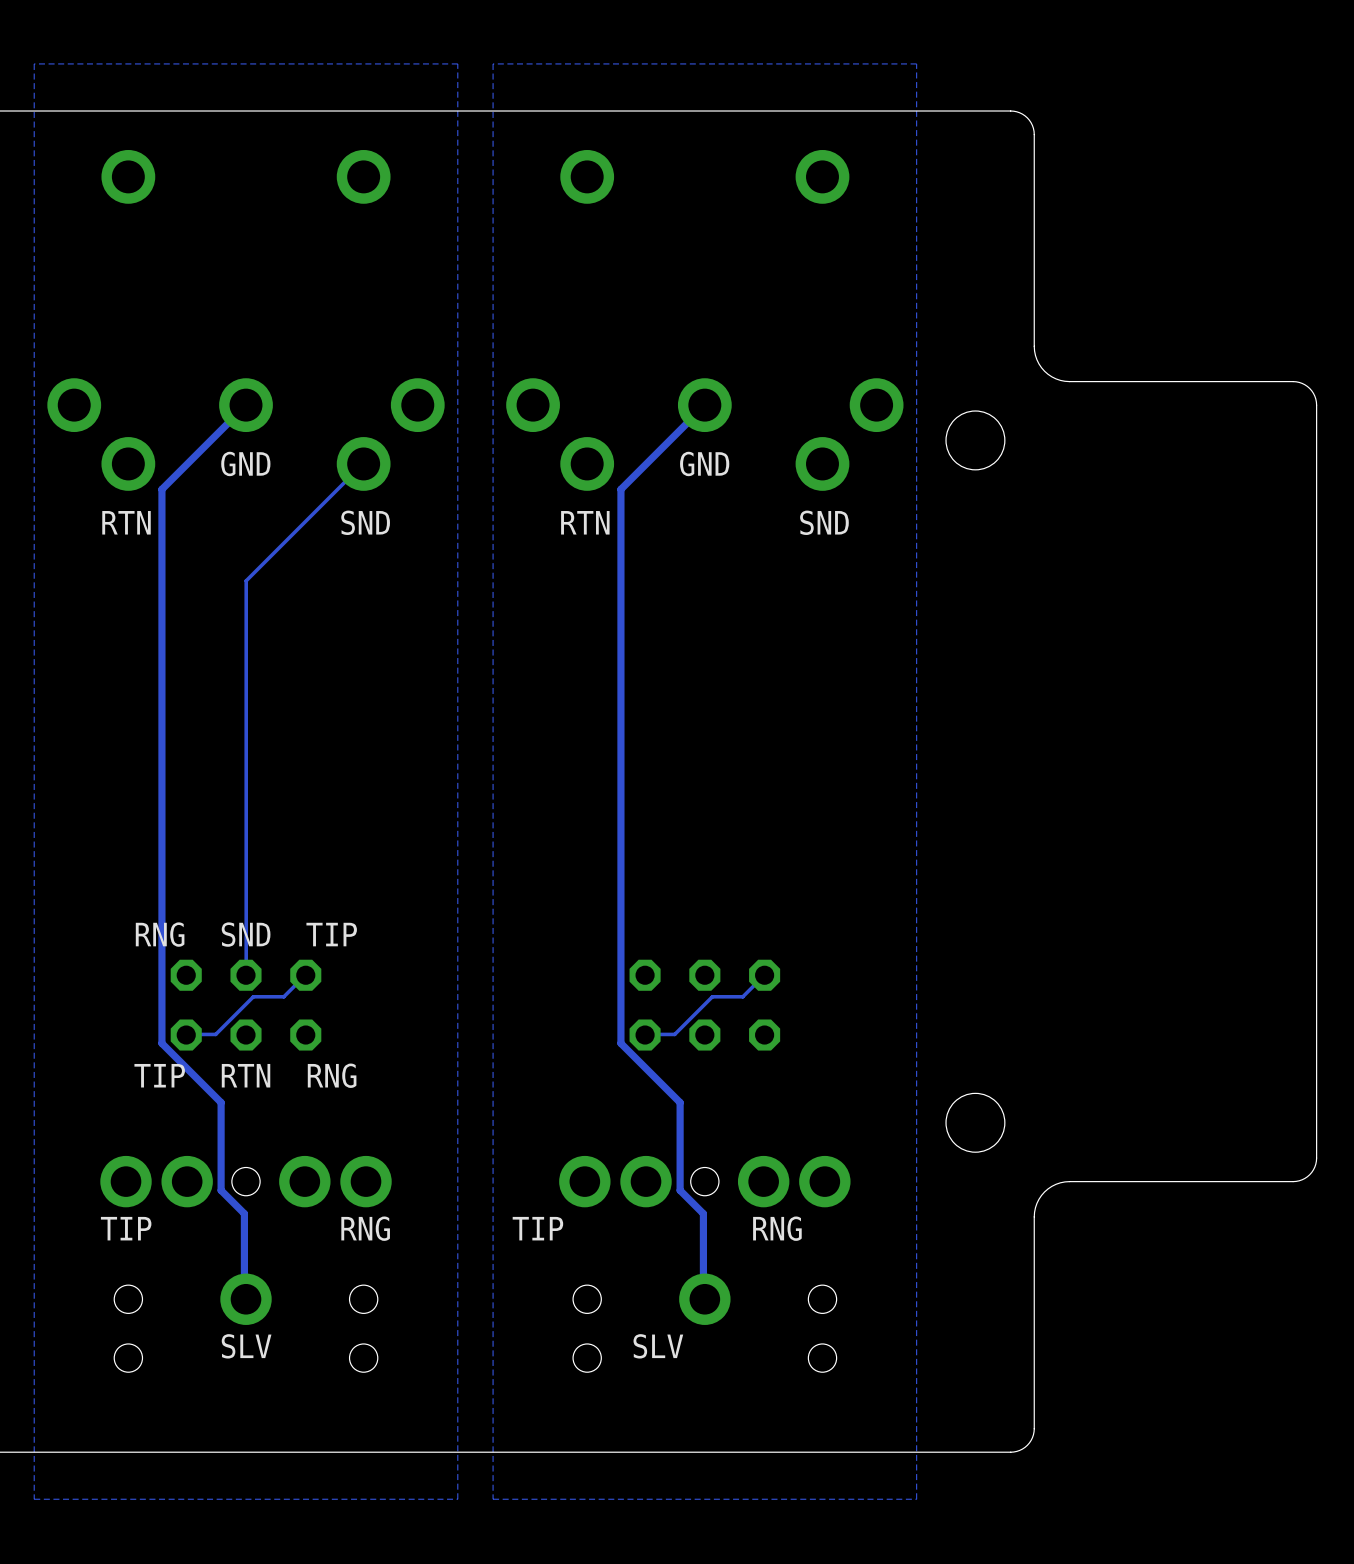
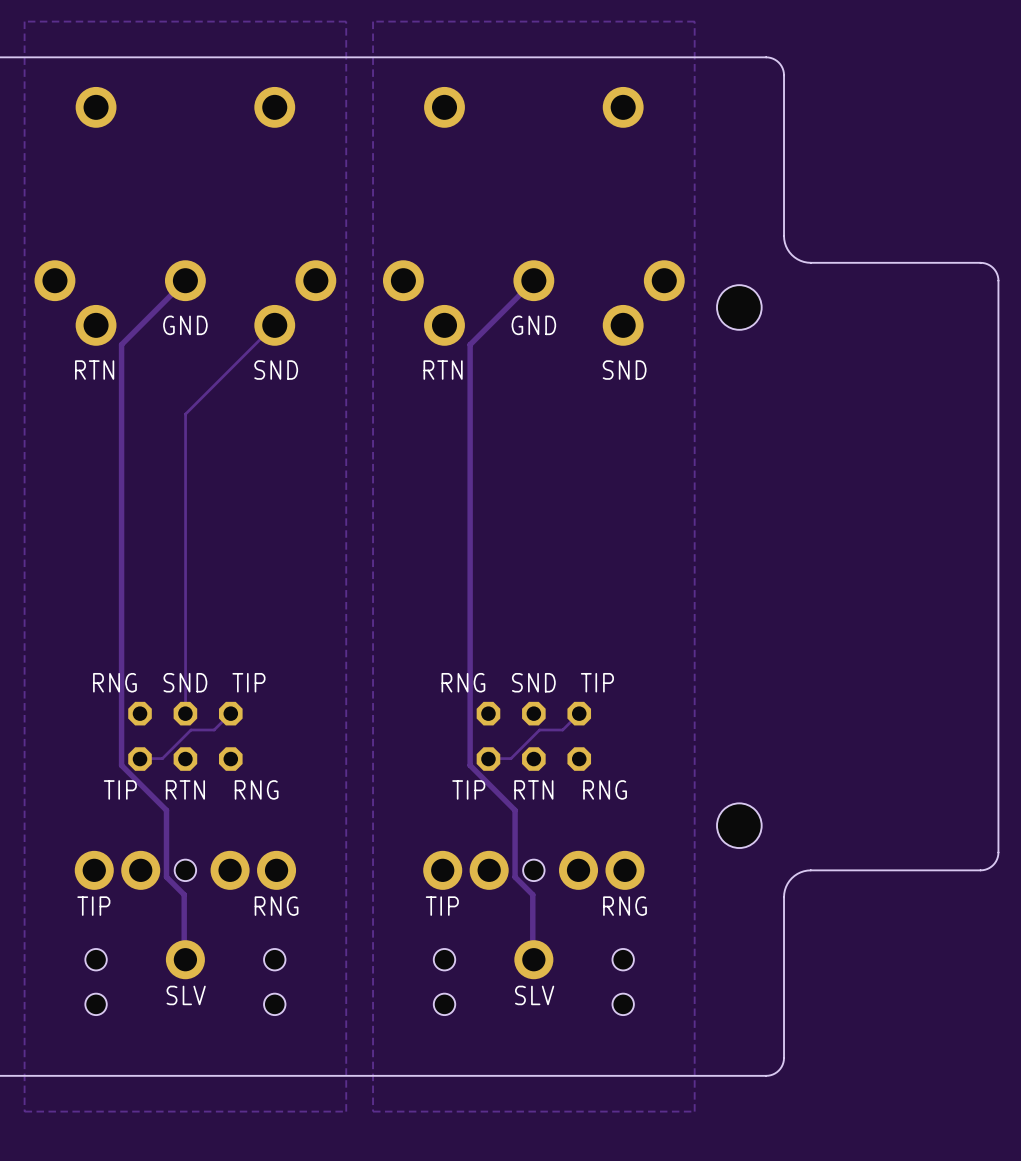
text: none -> RNG (463, 682)
text: none -> SND (533, 682)
text: none -> TIP (597, 682)
text: none -> TIP (468, 789)
text: none -> RTN (533, 789)
text: none -> RNG (605, 789)
text position: TIP (537, 1228) -> TIP (442, 906)
text position: RNG (777, 1228) -> RNG (625, 906)
text position: SLV (658, 1346) -> SLV (534, 995)

